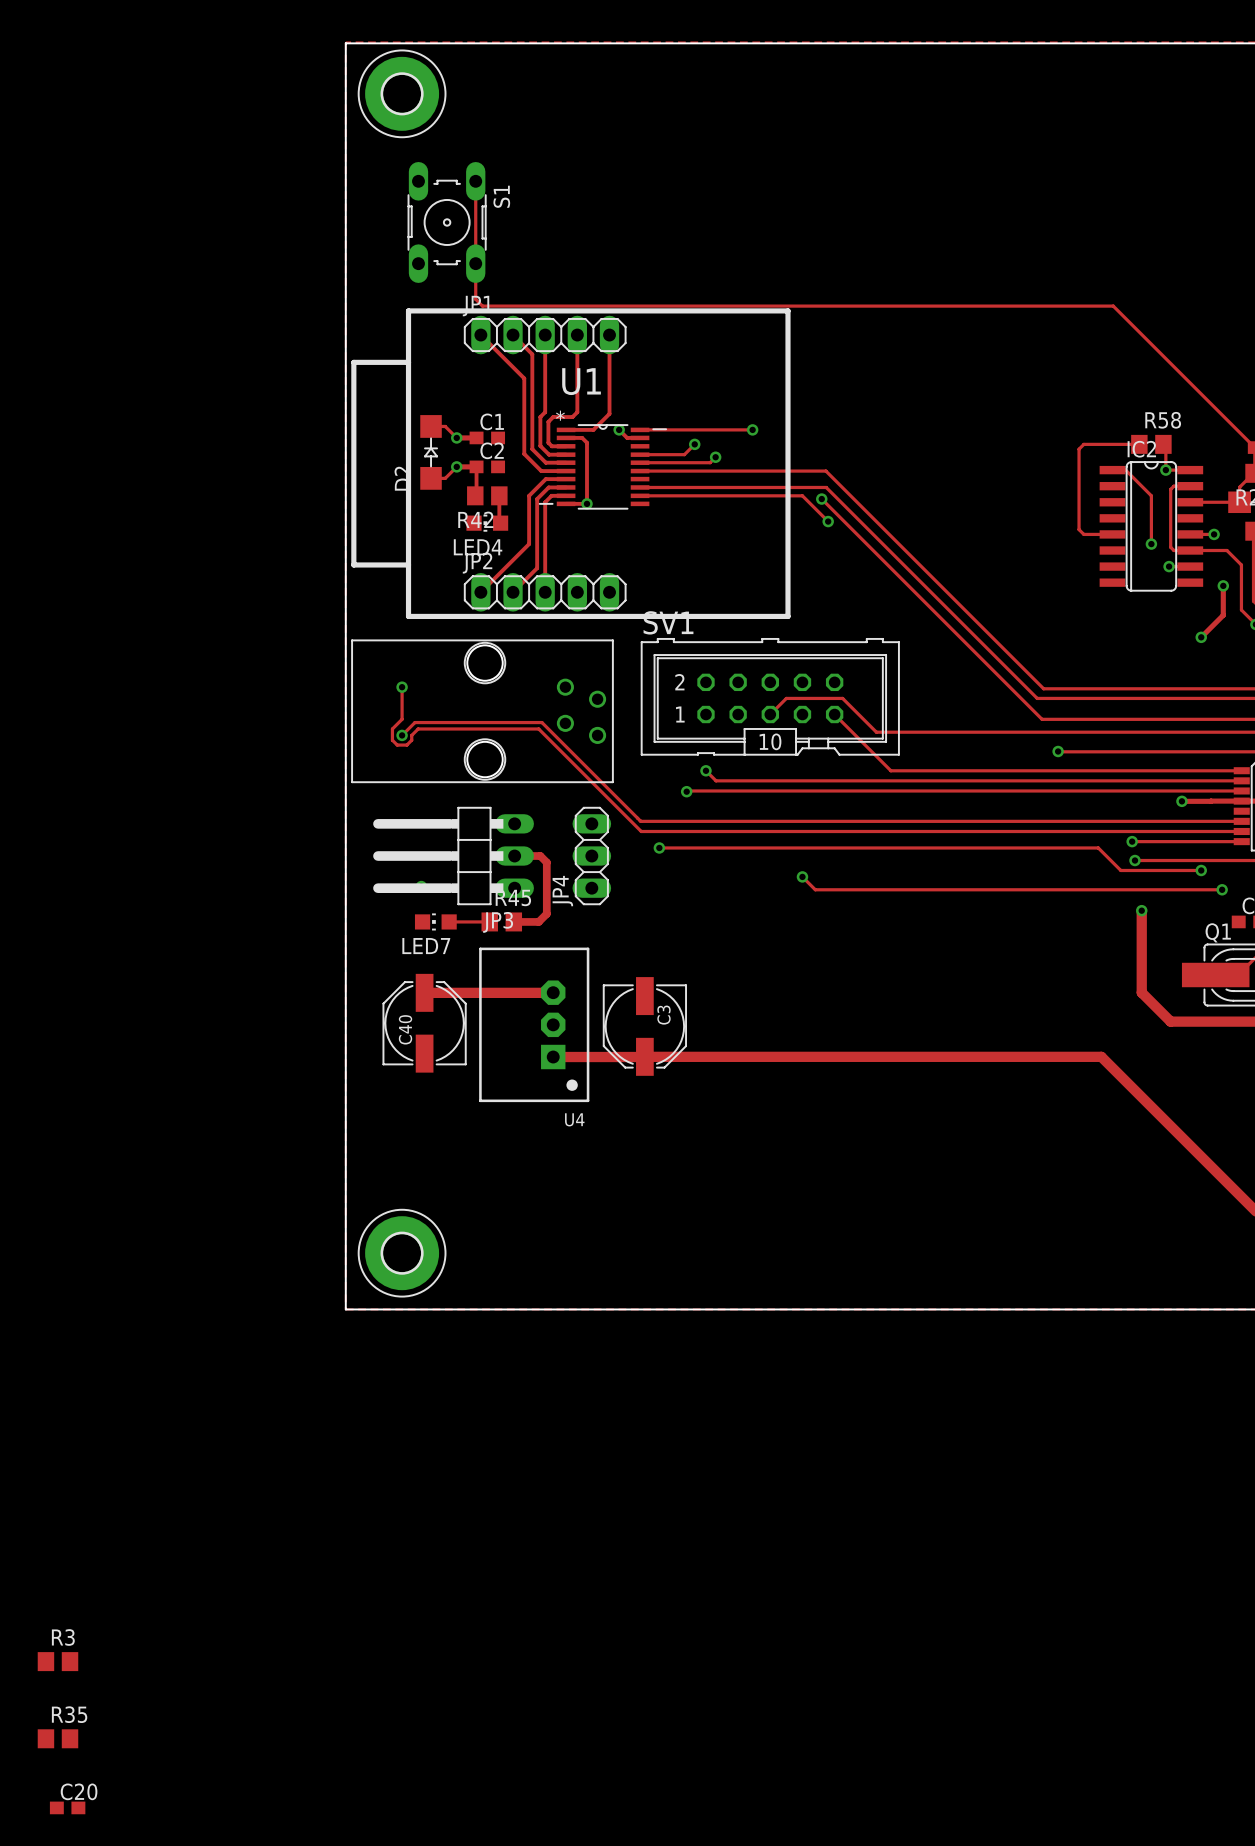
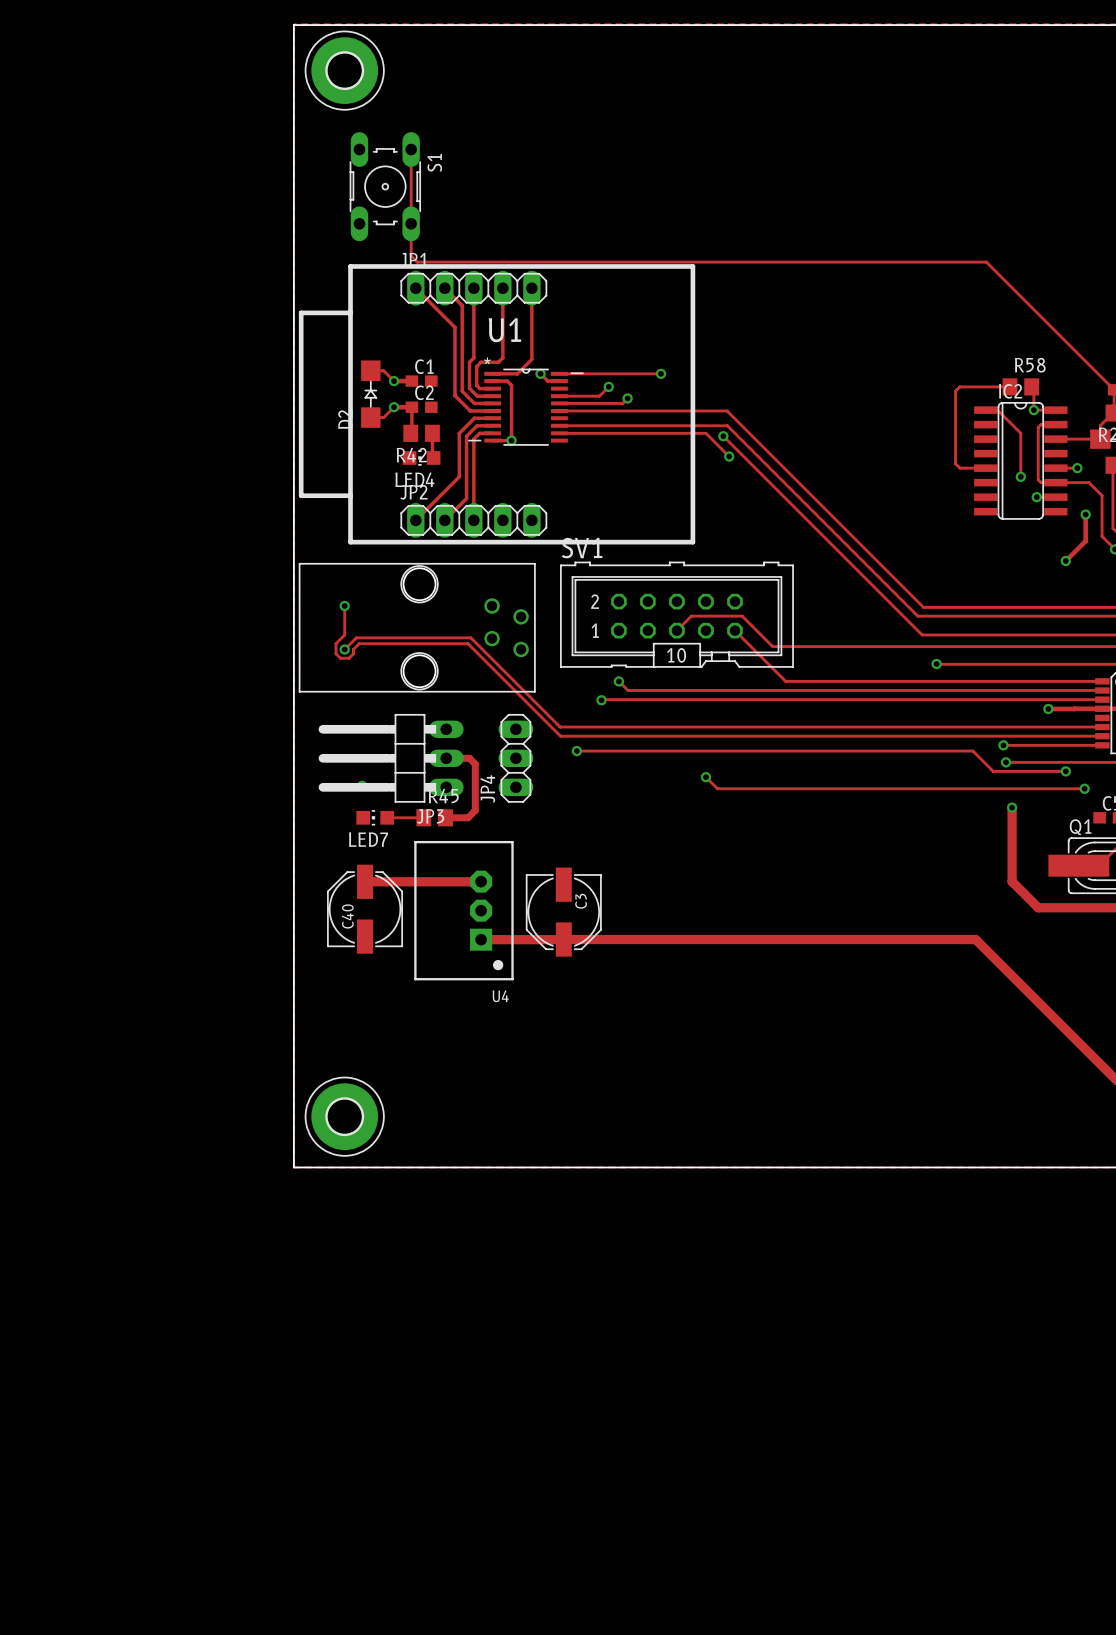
R3: (57, 1661) -> none
R35: (57, 1738) -> none
C20: (67, 1807) -> none

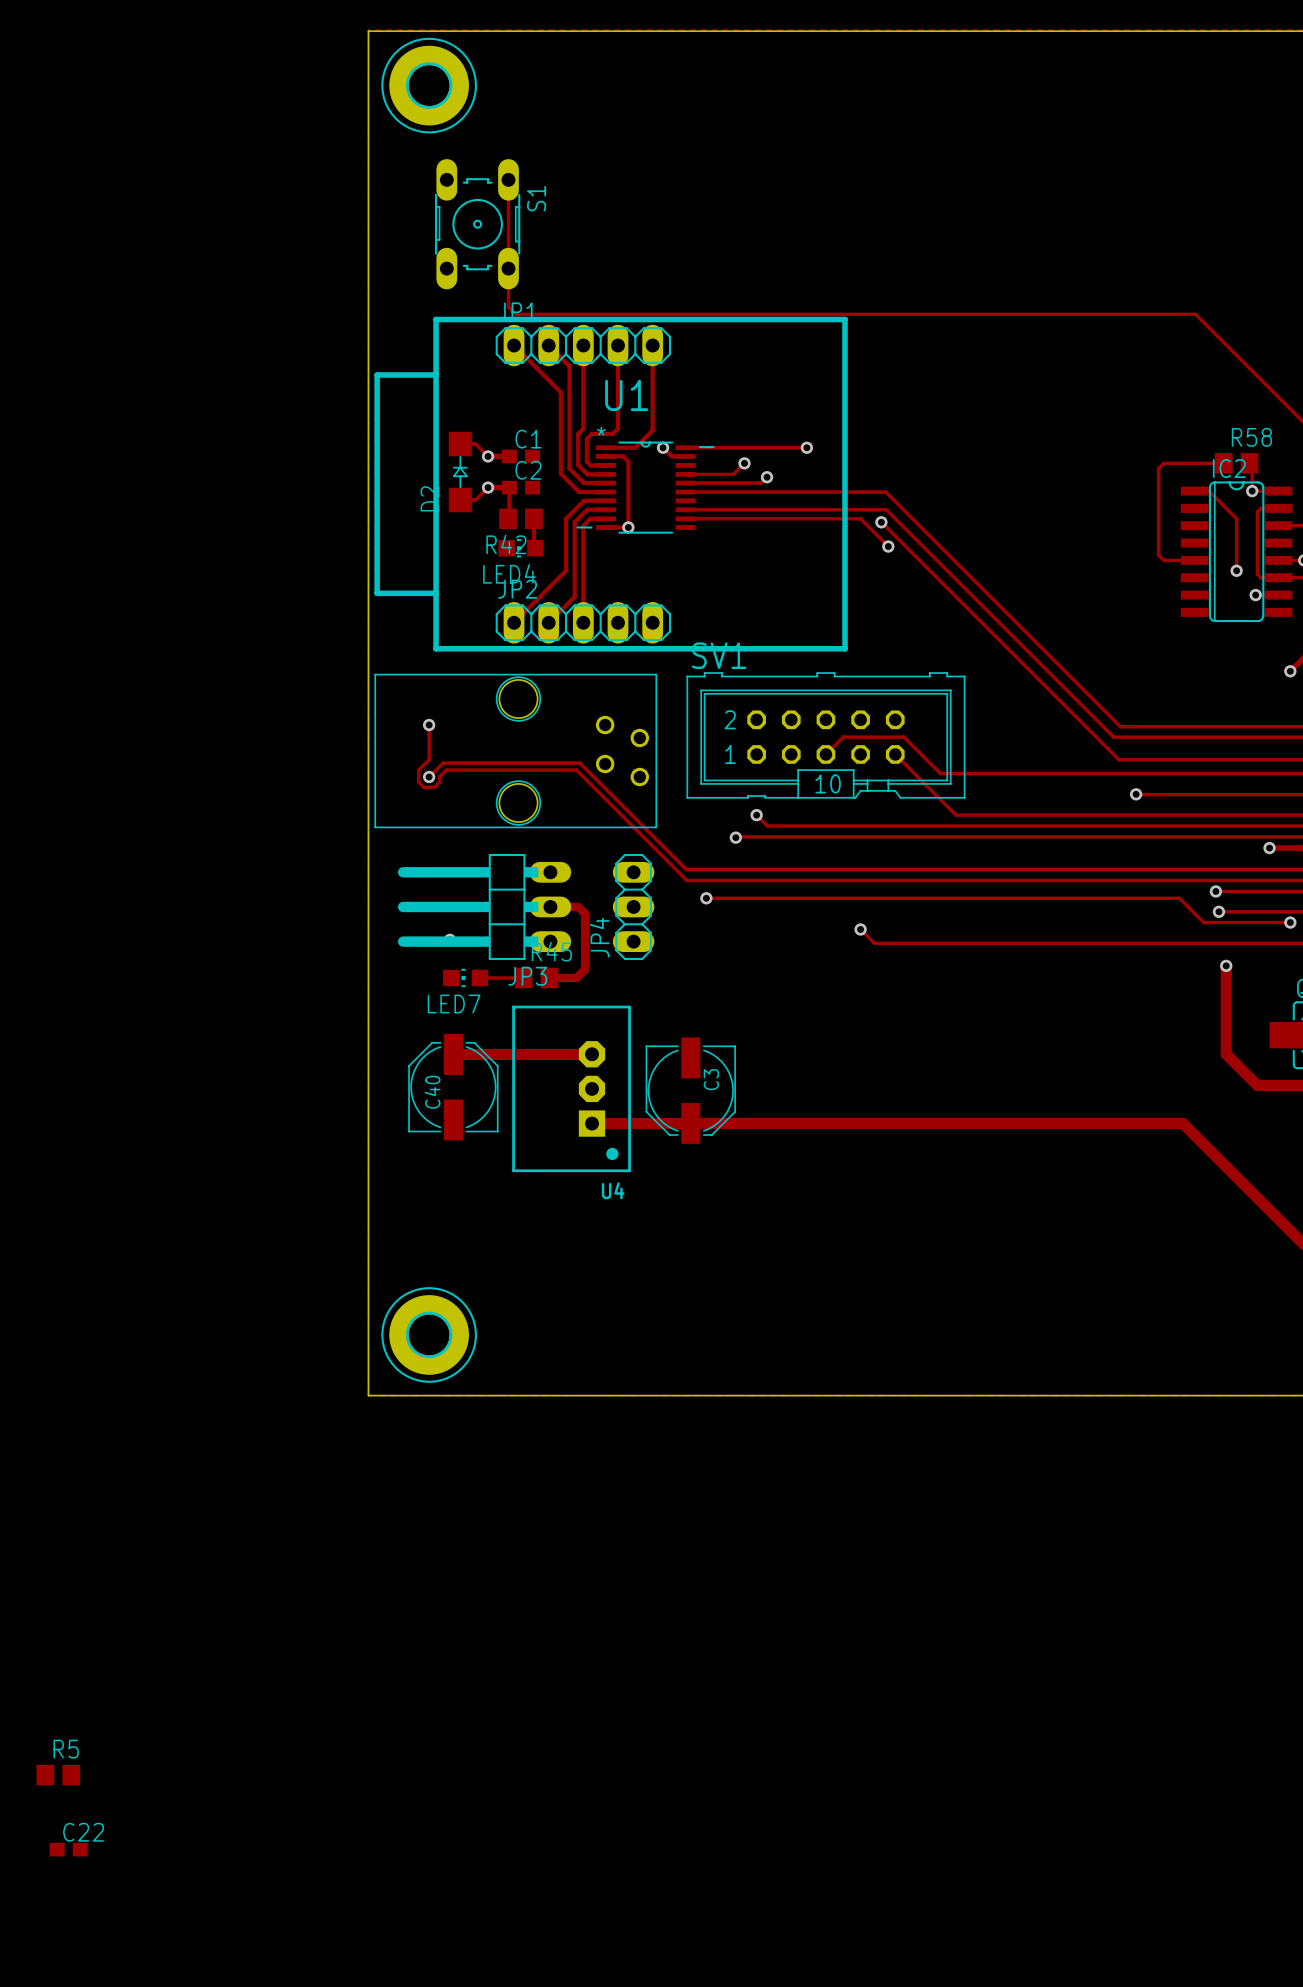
R5: none -> (58, 1775)
C22: none -> (68, 1849)

